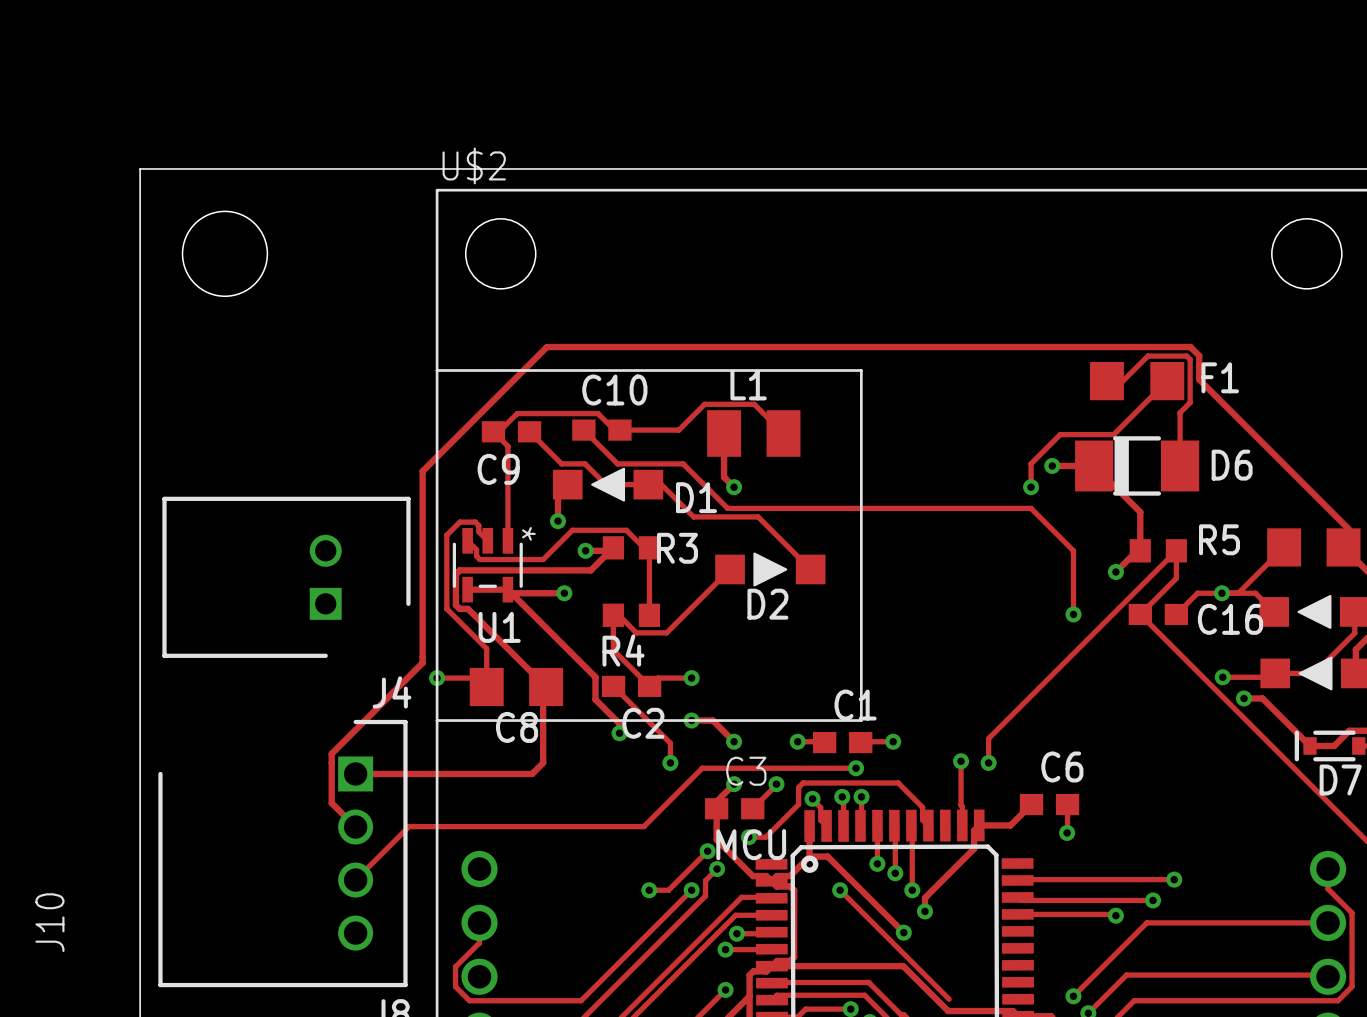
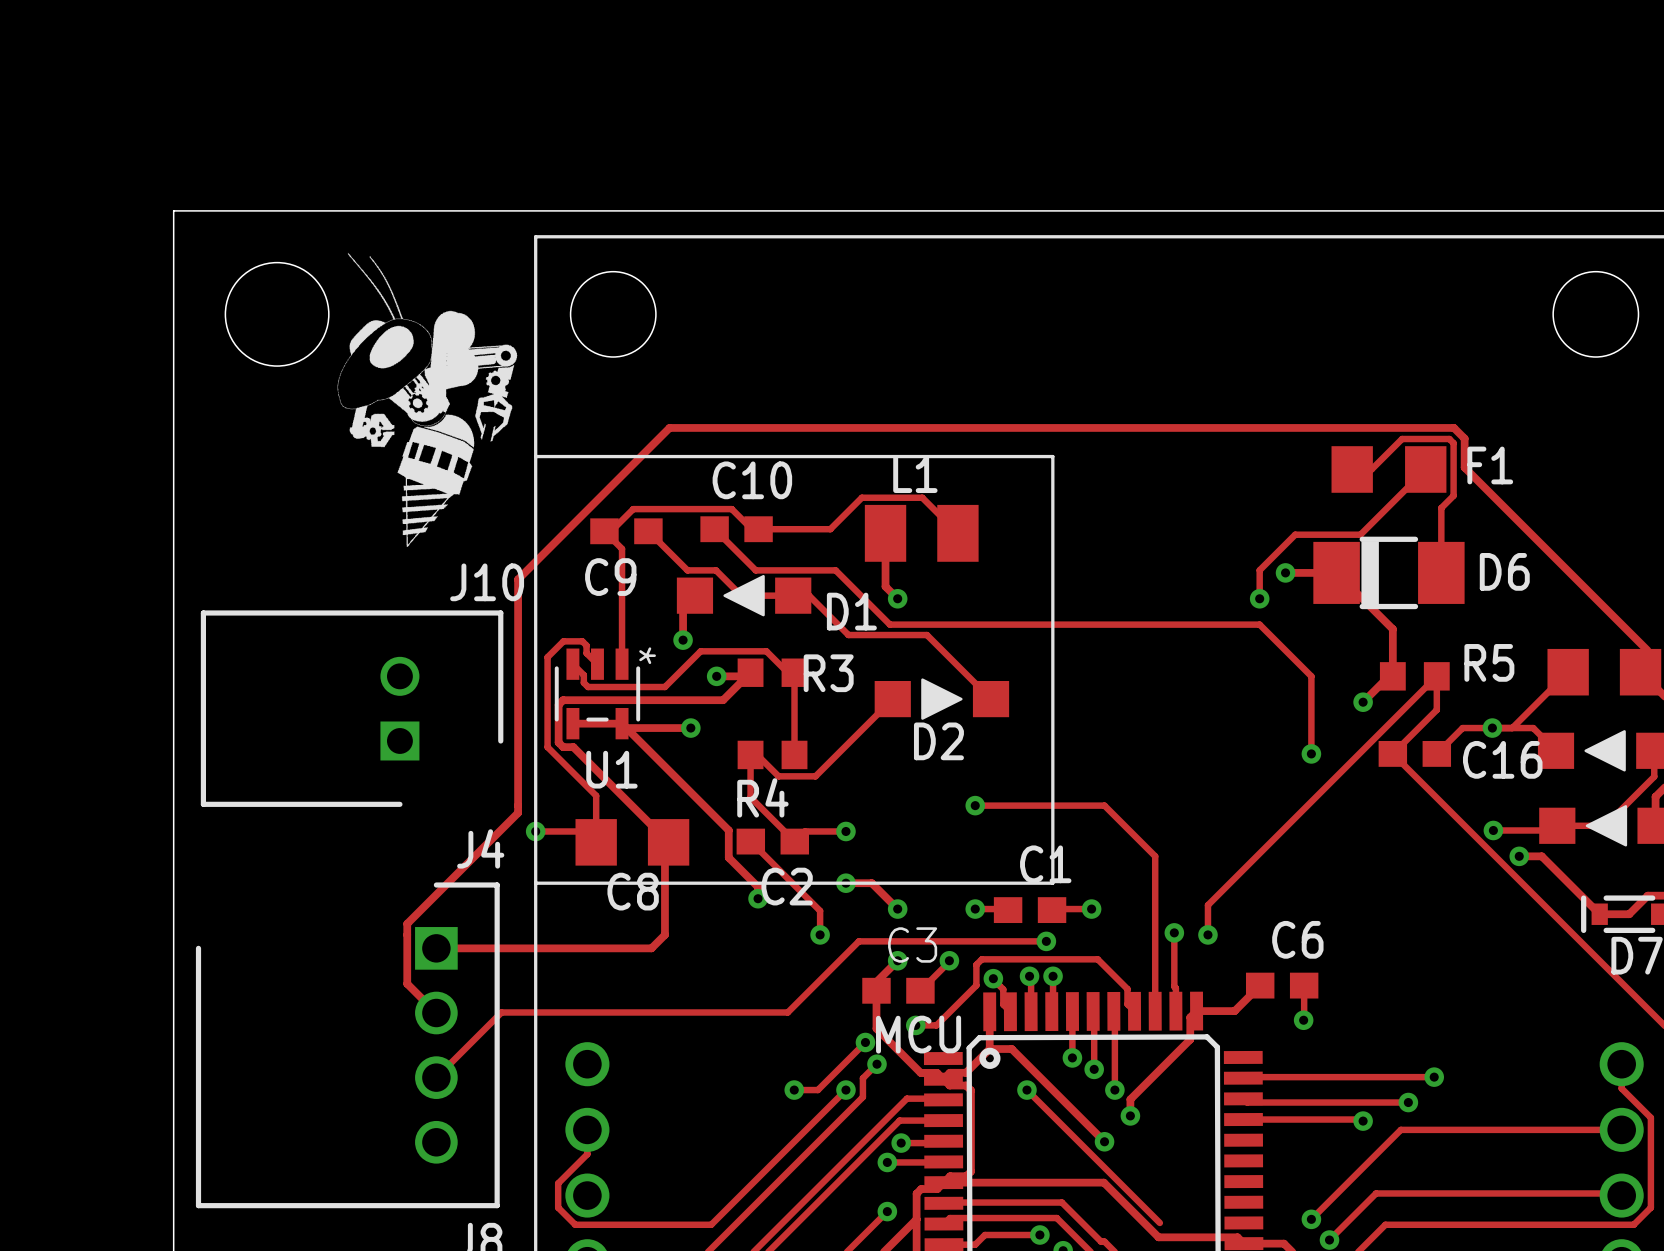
U$2 name: U$2 (474, 165) -> none
drawing: none -> [337, 252, 518, 547]
track: none -> (975, 805) (1104, 805) (1155, 856) (1155, 1011)
via: none -> (975, 805)
J10 name rotation: 0° (49, 922) -> 90° clockwise (487, 582)
J10 name position: J10 (49, 922) -> J10 (487, 582)

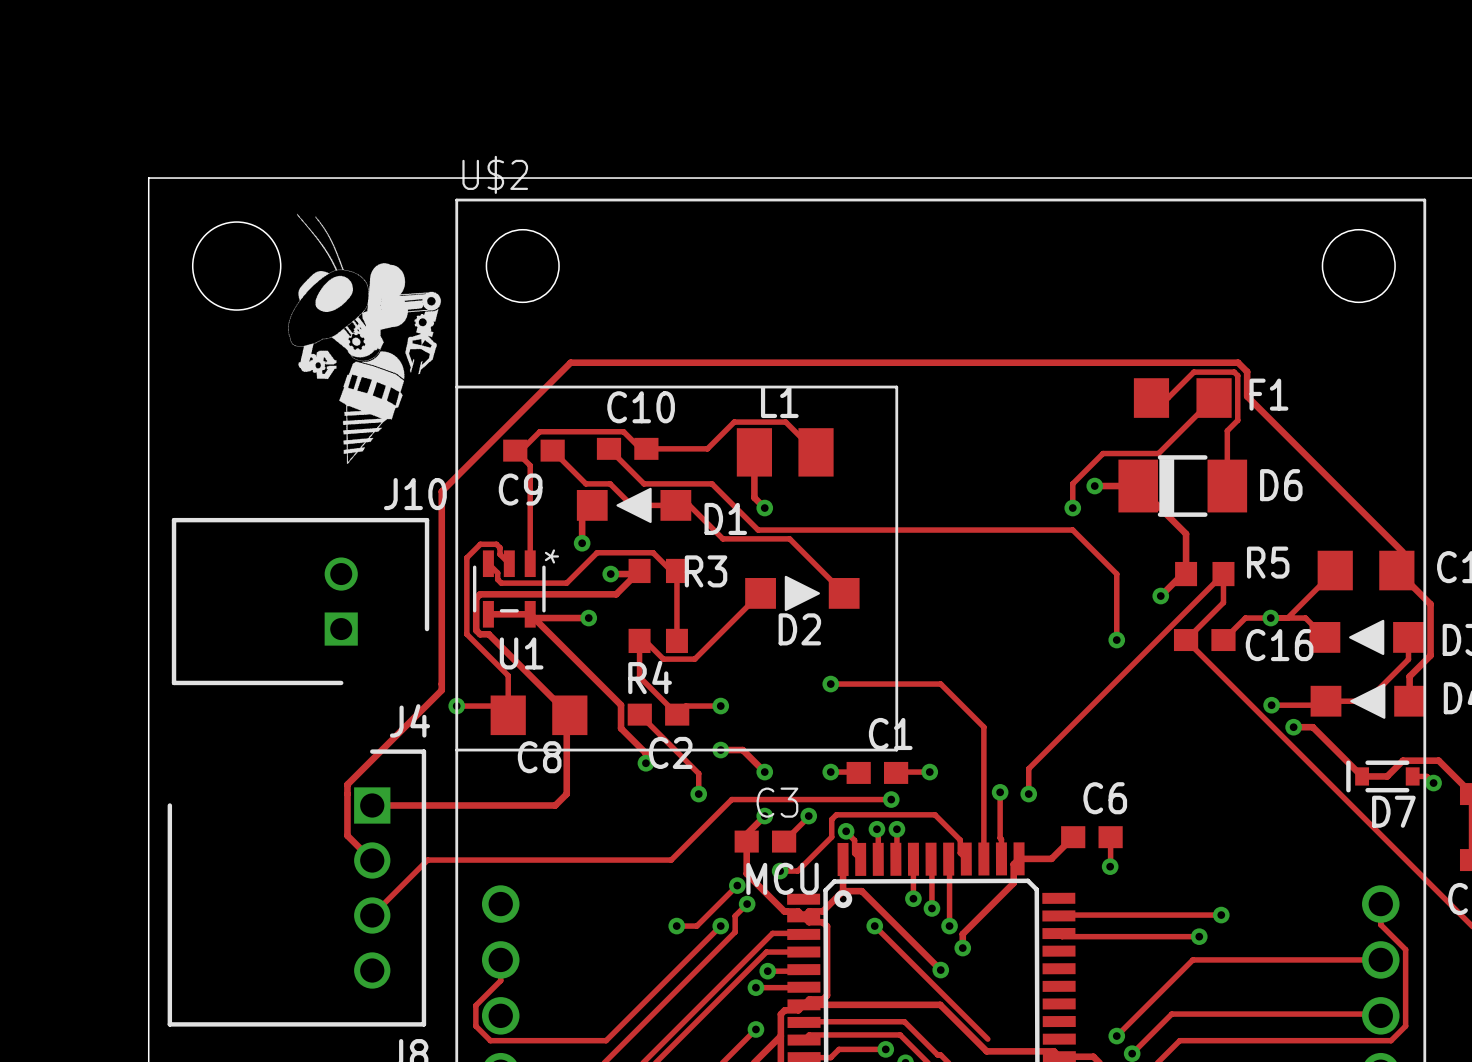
U$2 name: none -> U$2 (495, 174)
track: (1243, 1119) (1361, 1119) (1363, 1121) -> none
via: (1363, 1121) -> none

